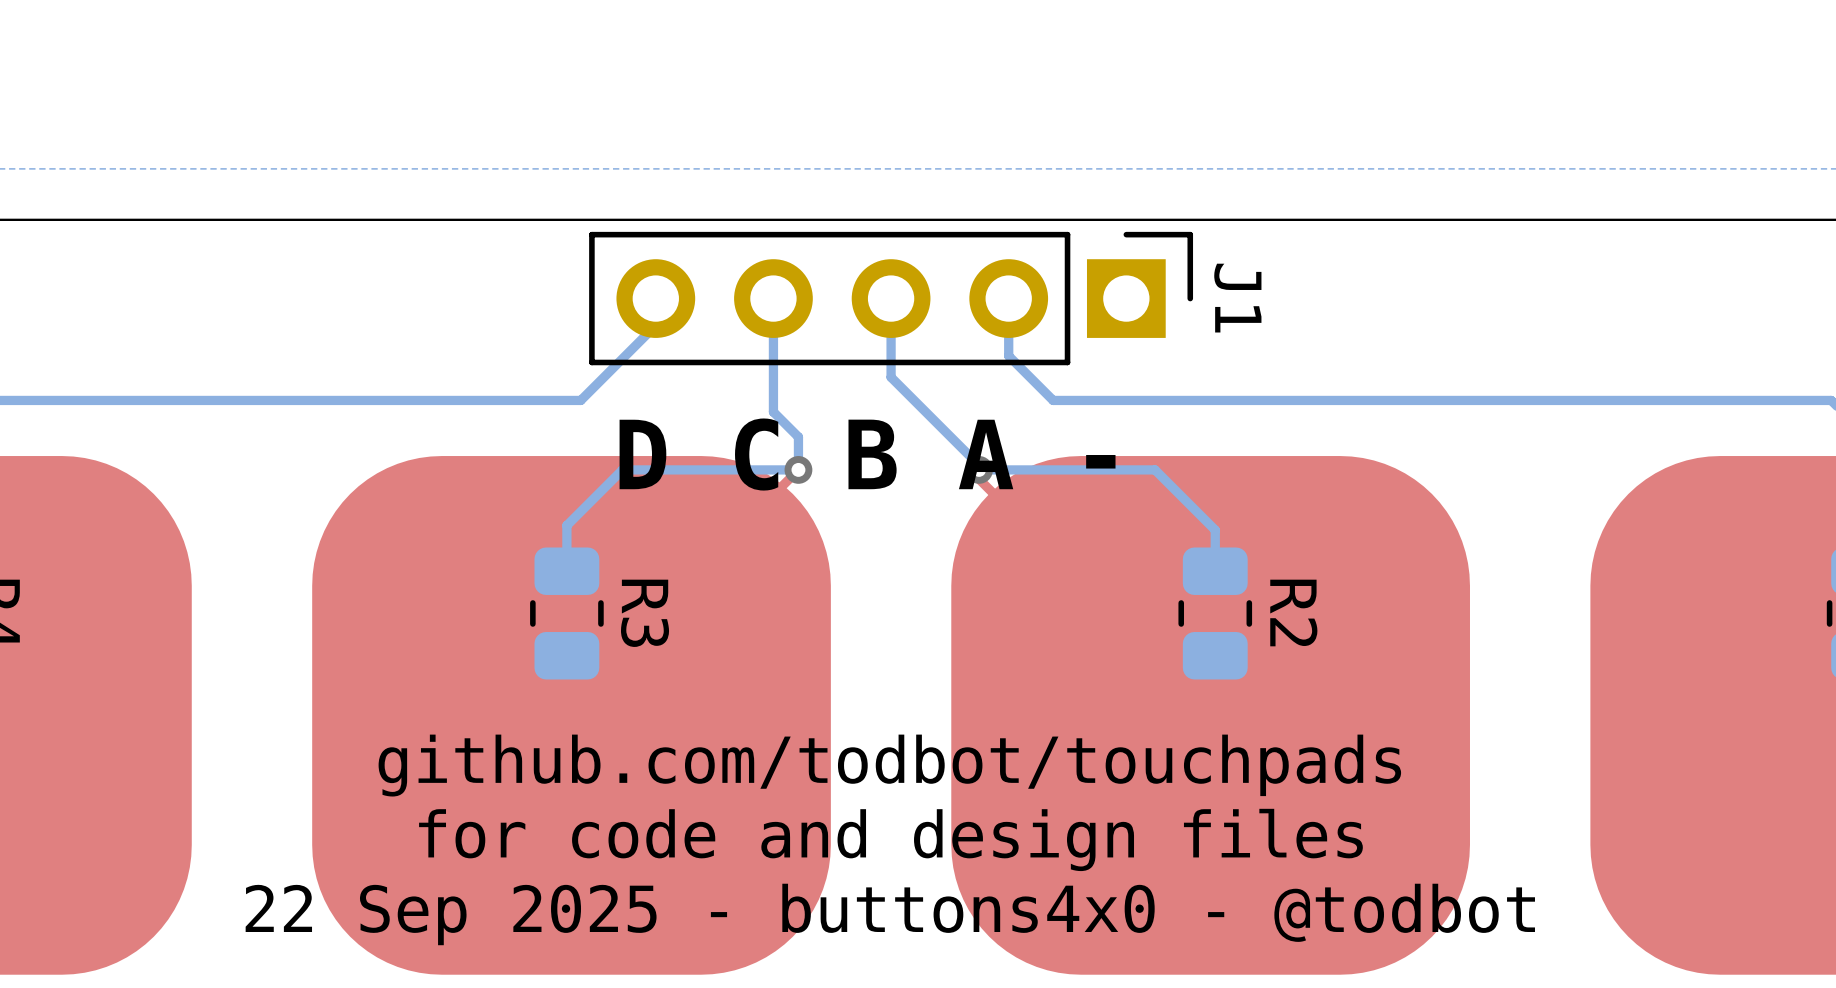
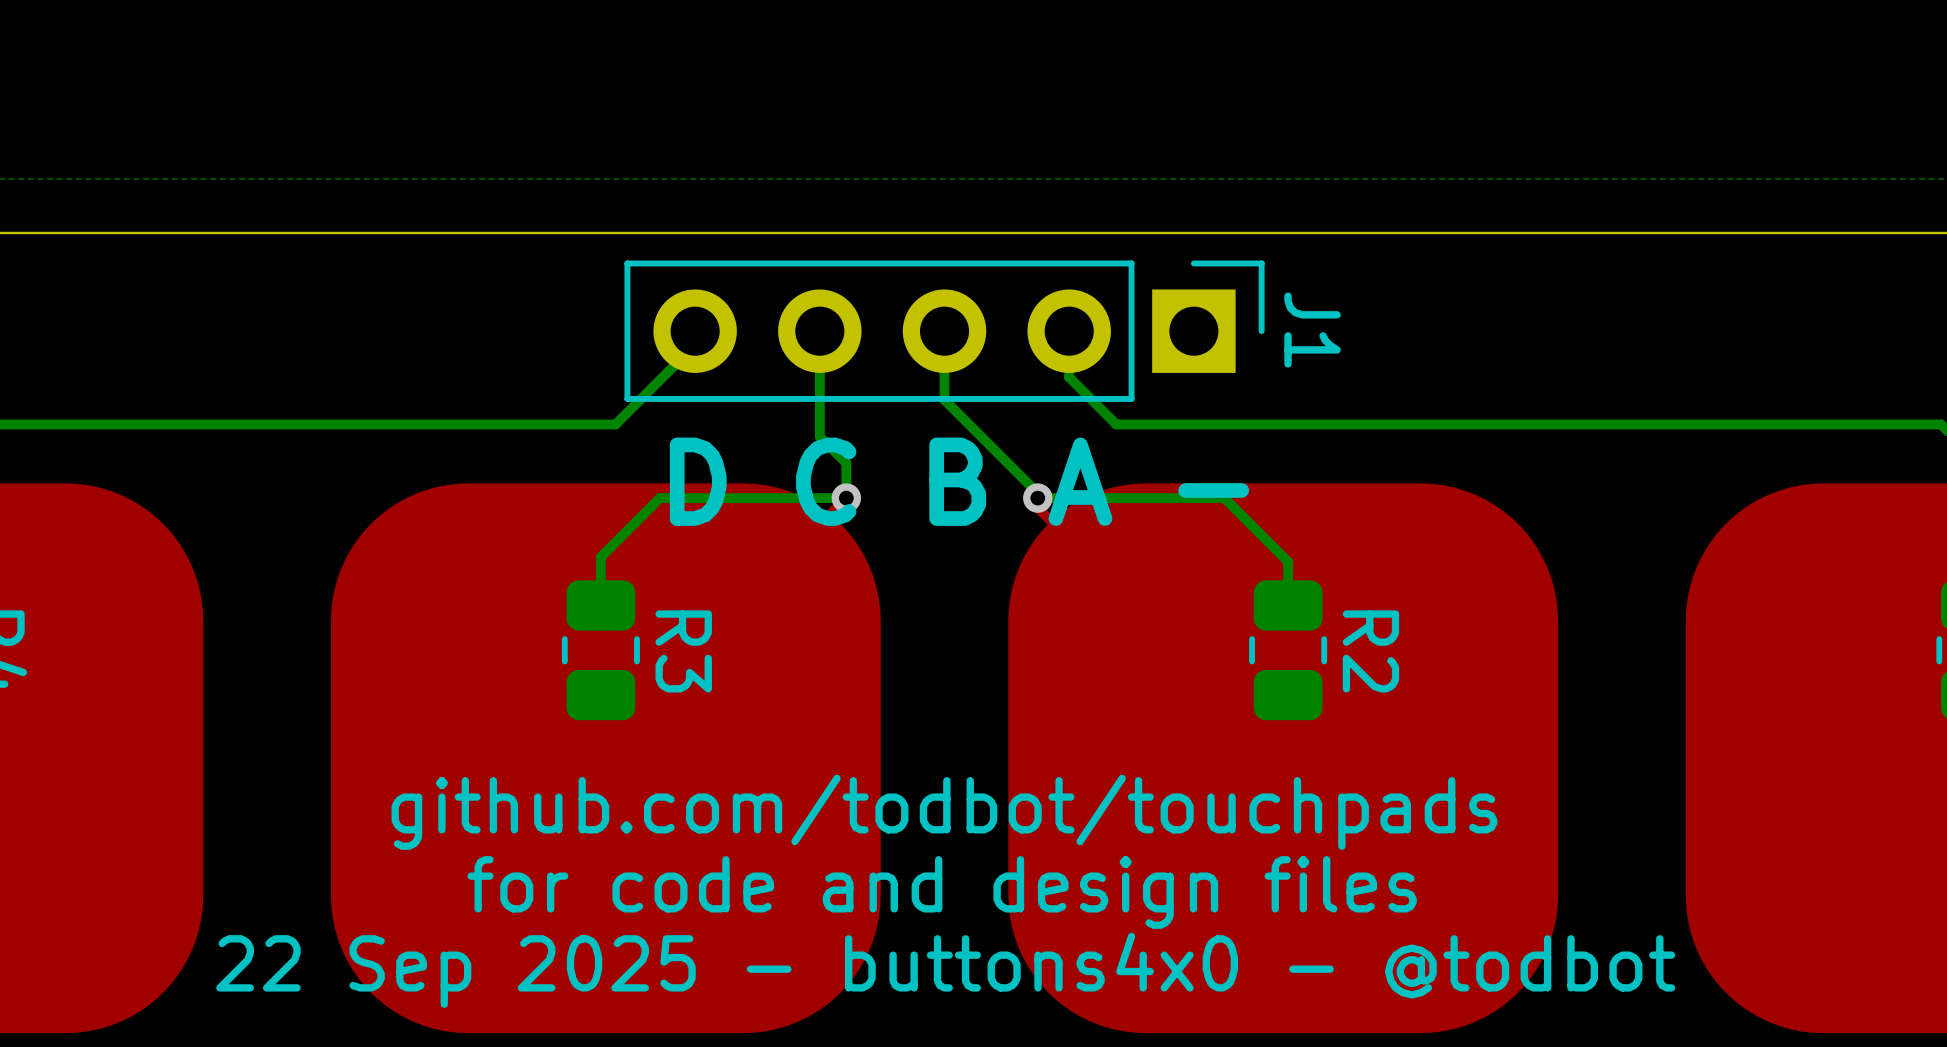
J1 position: (891, 298) -> (944, 331)

